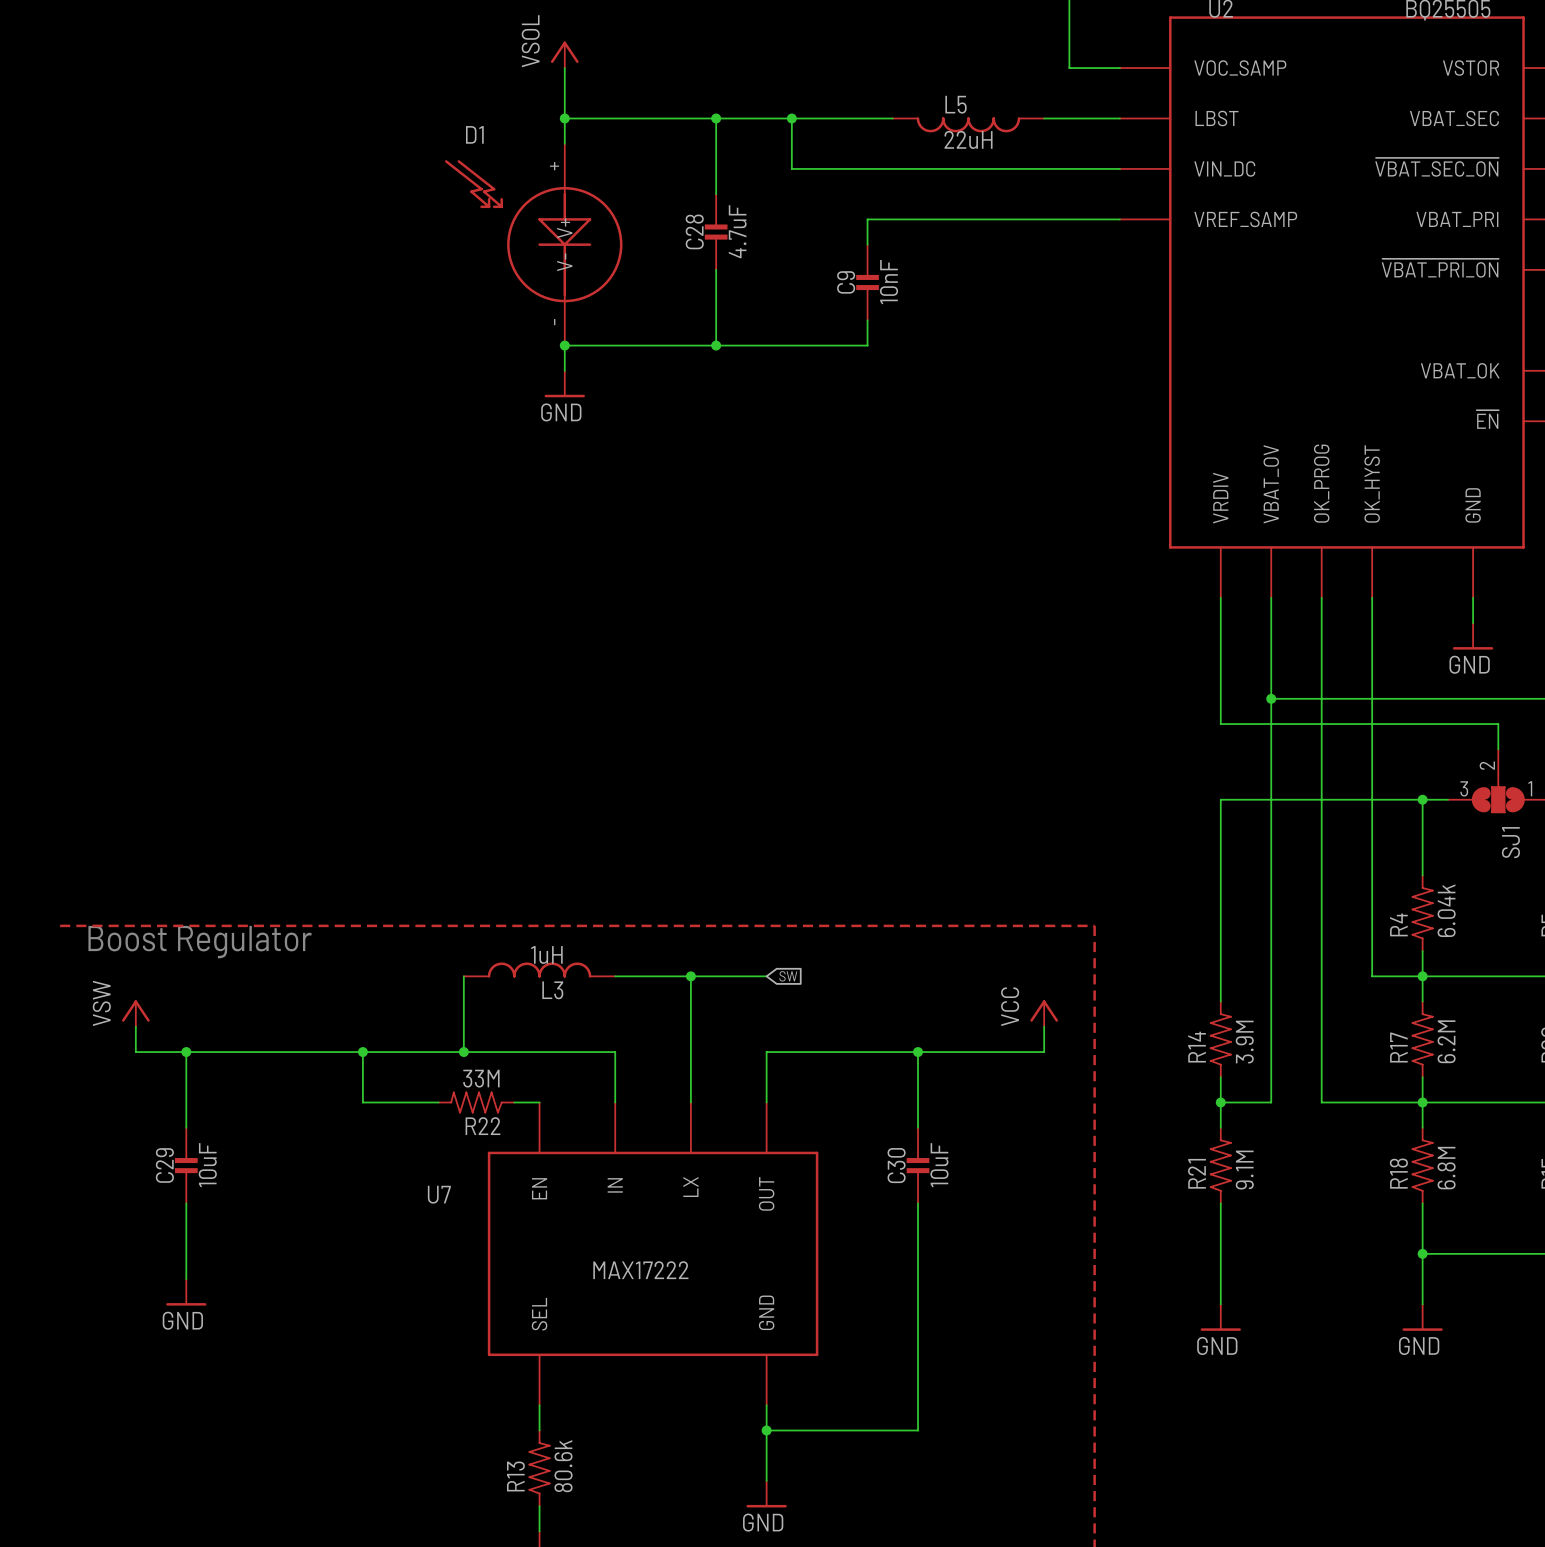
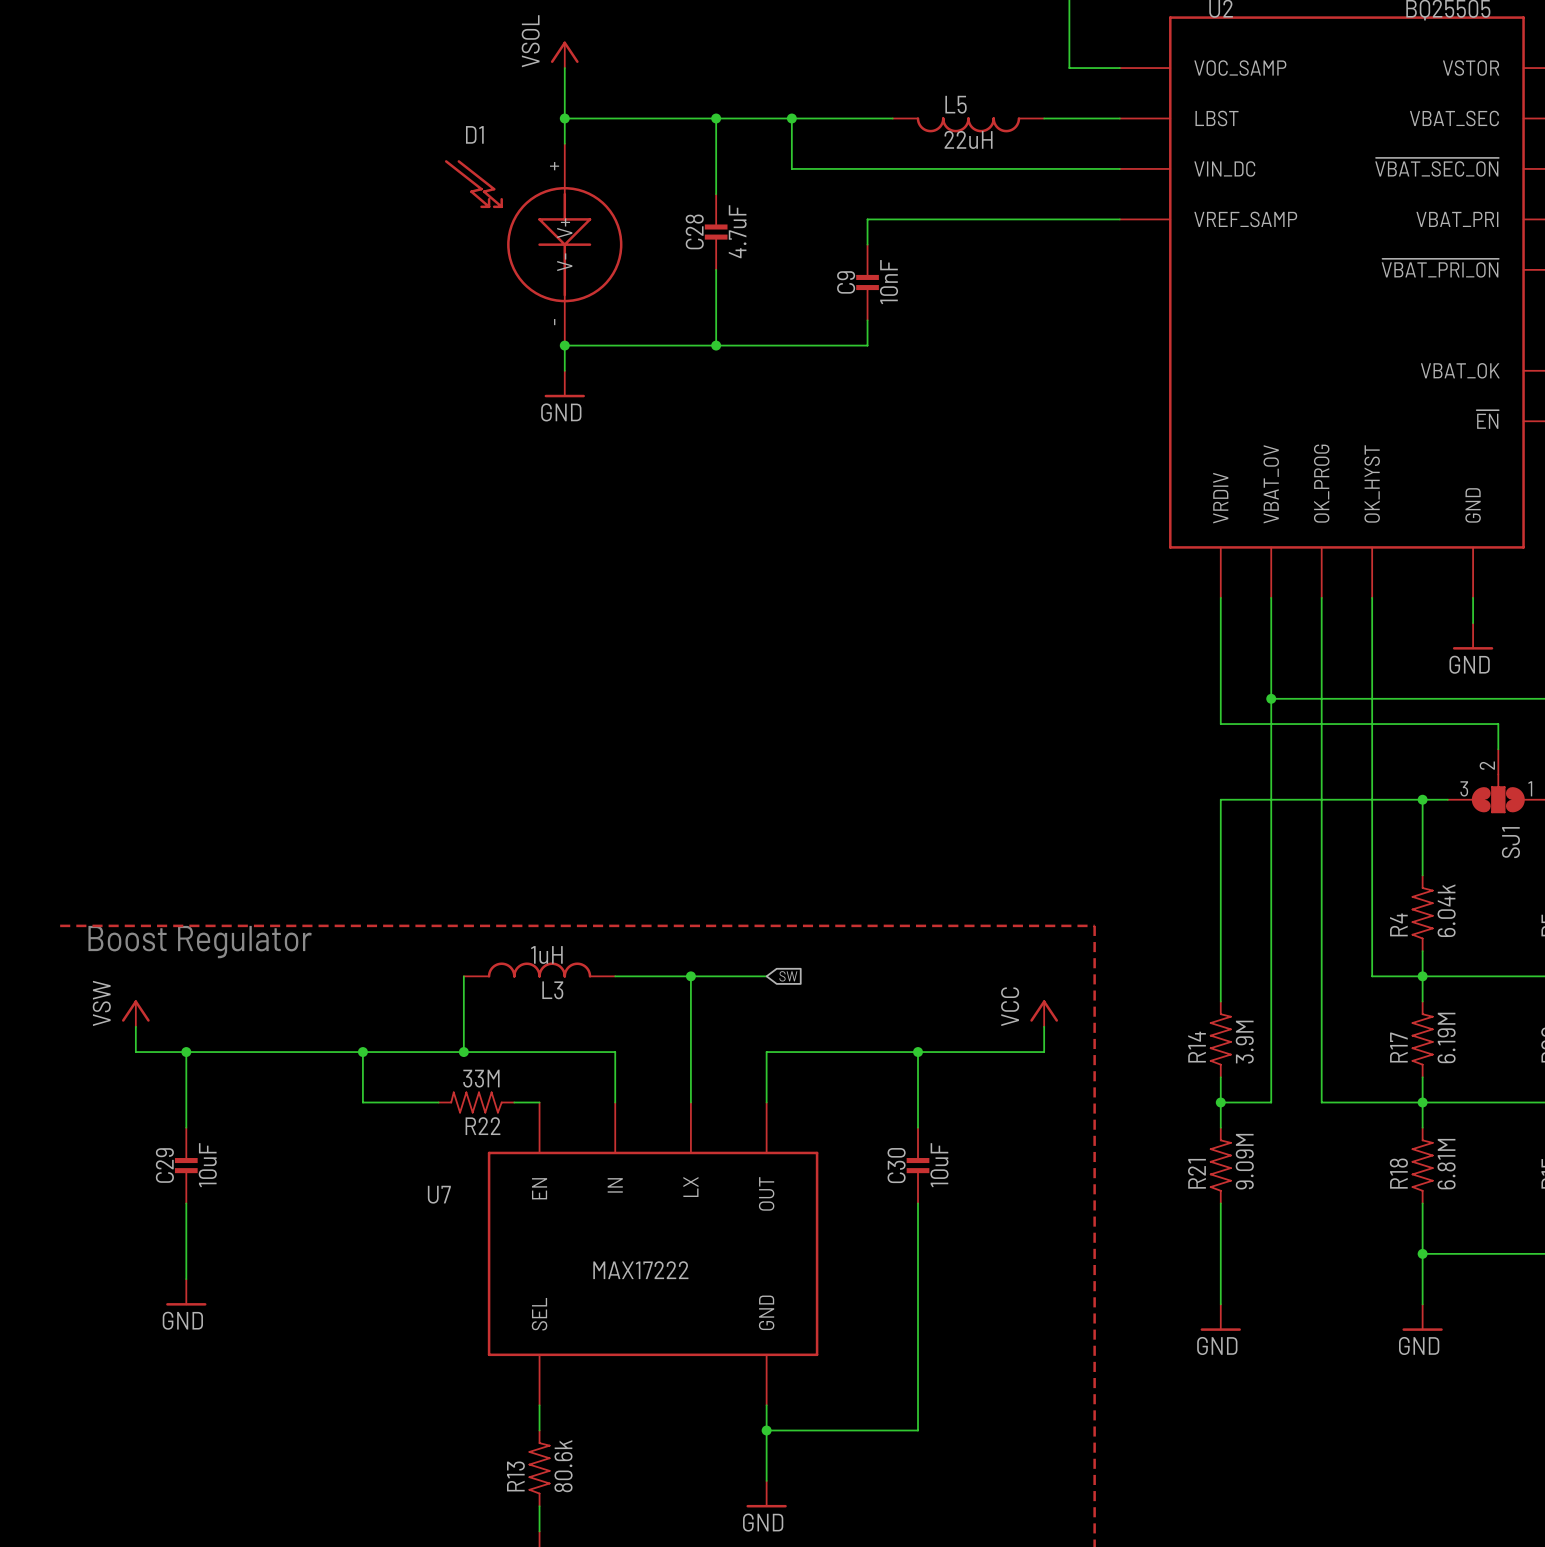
R17 value: 6.2M (1446, 1041) -> 6.19M (1446, 1037)
R18 value: 6.8M (1446, 1168) -> 6.81M (1446, 1164)
R21 value: 9.1M (1244, 1170) -> 9.09M (1244, 1161)

